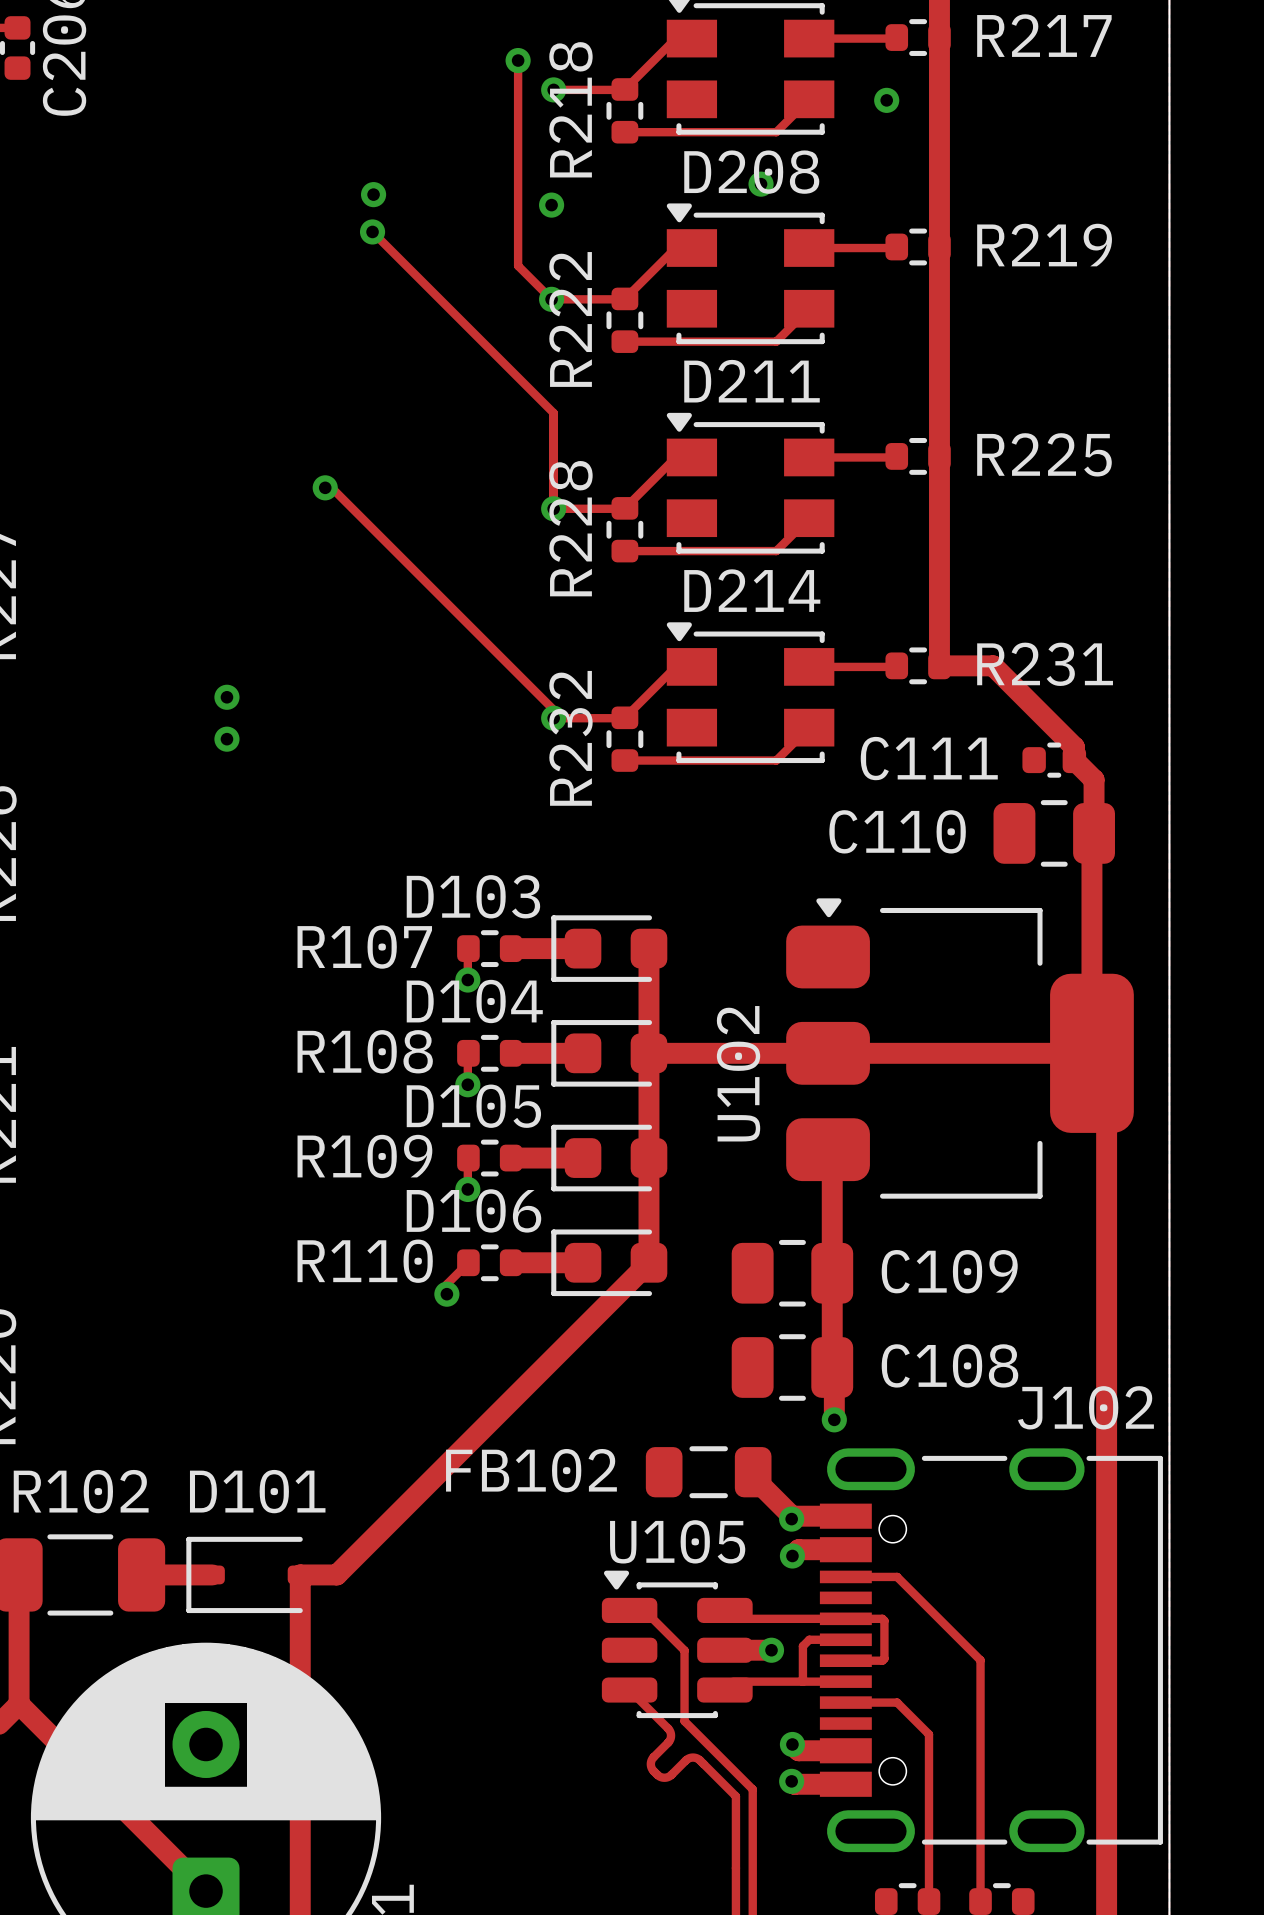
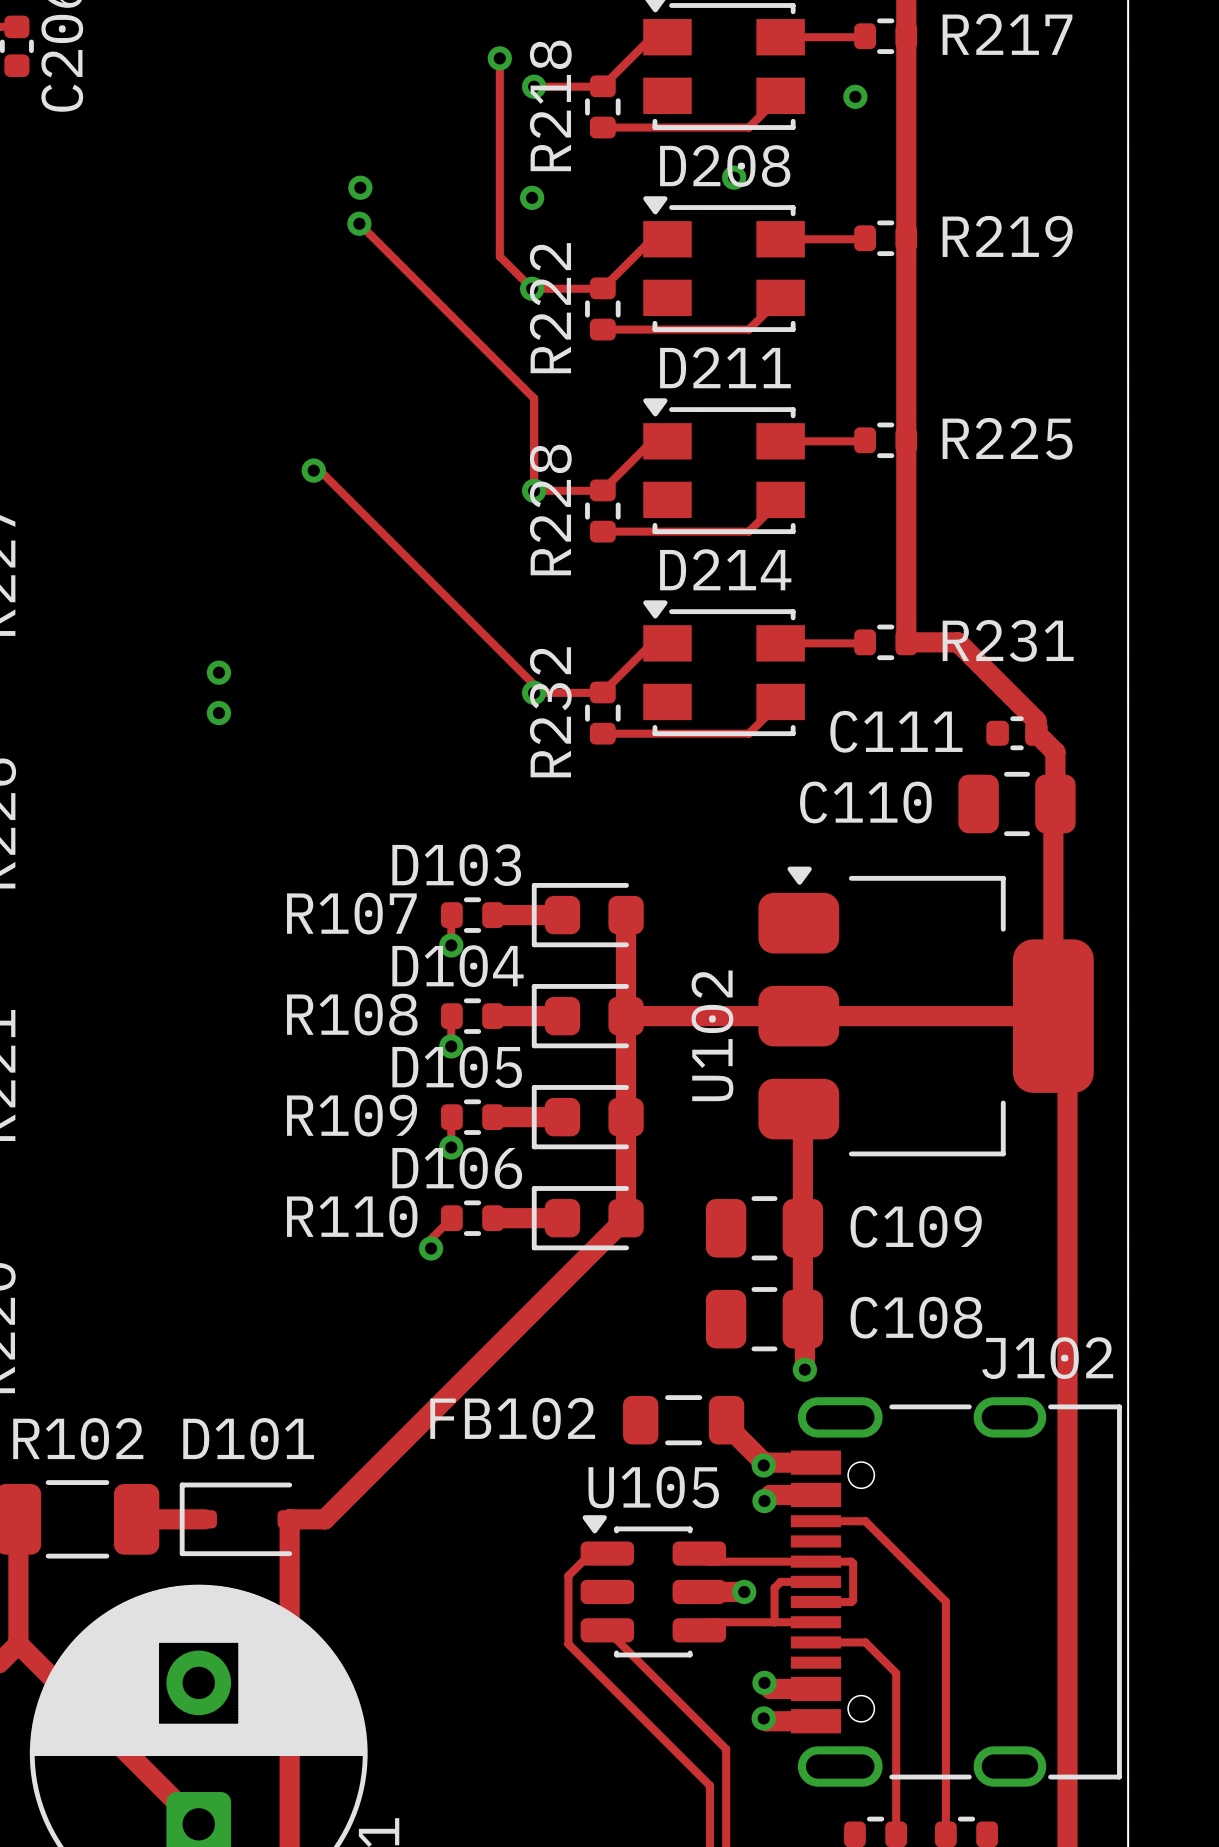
track: none -> (590, 1553) (568, 1575) (568, 1644) (709, 1785)
track: (629, 1610) (644, 1610) (684, 1650) (684, 1721) (752, 1789) (752, 1813) -> none
track: (668, 1728) (670, 1734) (669, 1740) (651, 1761) (651, 1768) (657, 1774) (662, 1777) (667, 1777) (688, 1758) (694, 1757) (700, 1760) -> (644, 1667) (675, 1698)
track: (735, 1796) (735, 1851) -> (709, 1732) (726, 1749)

